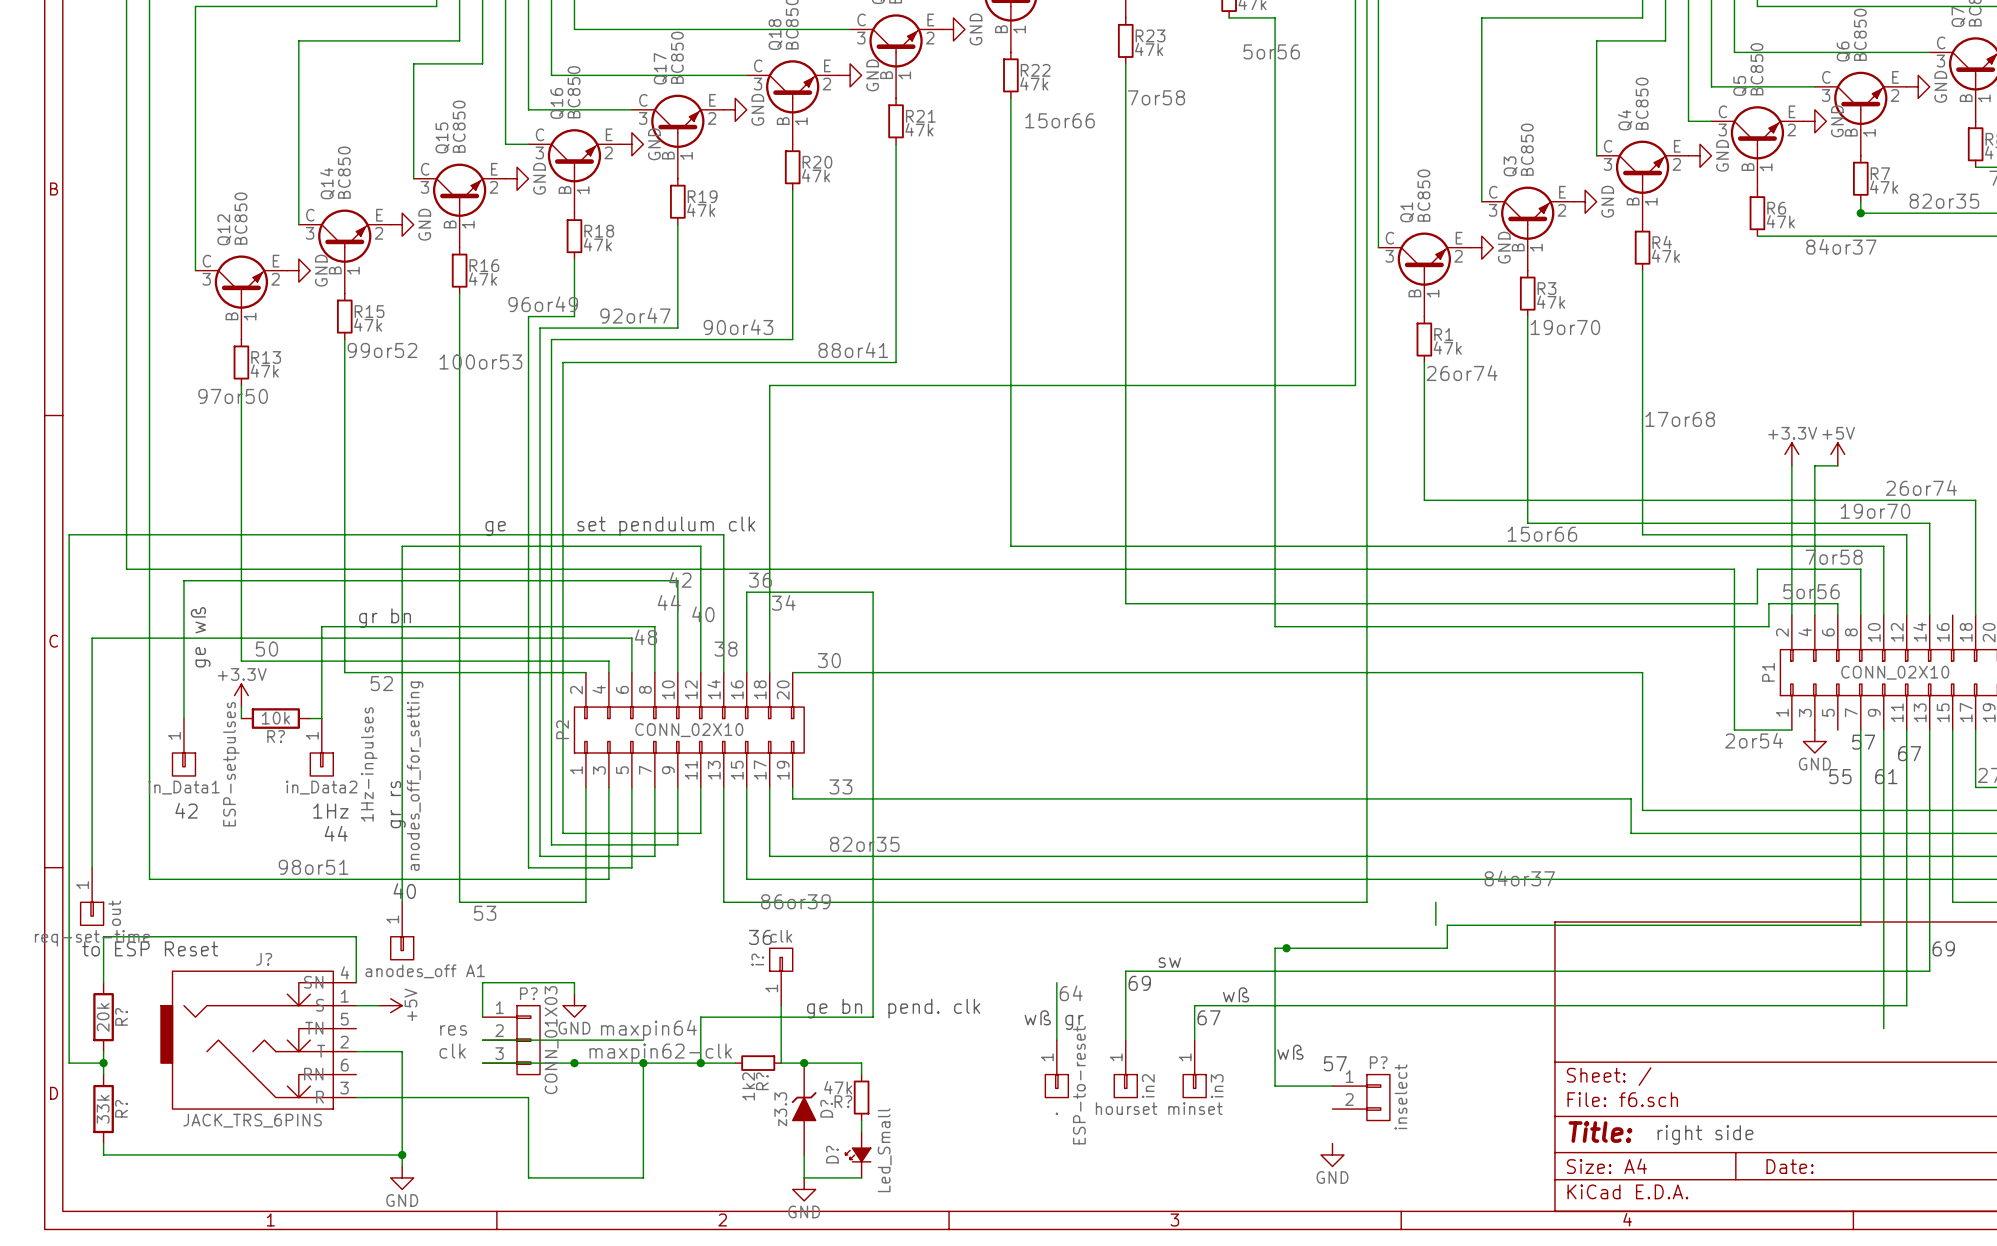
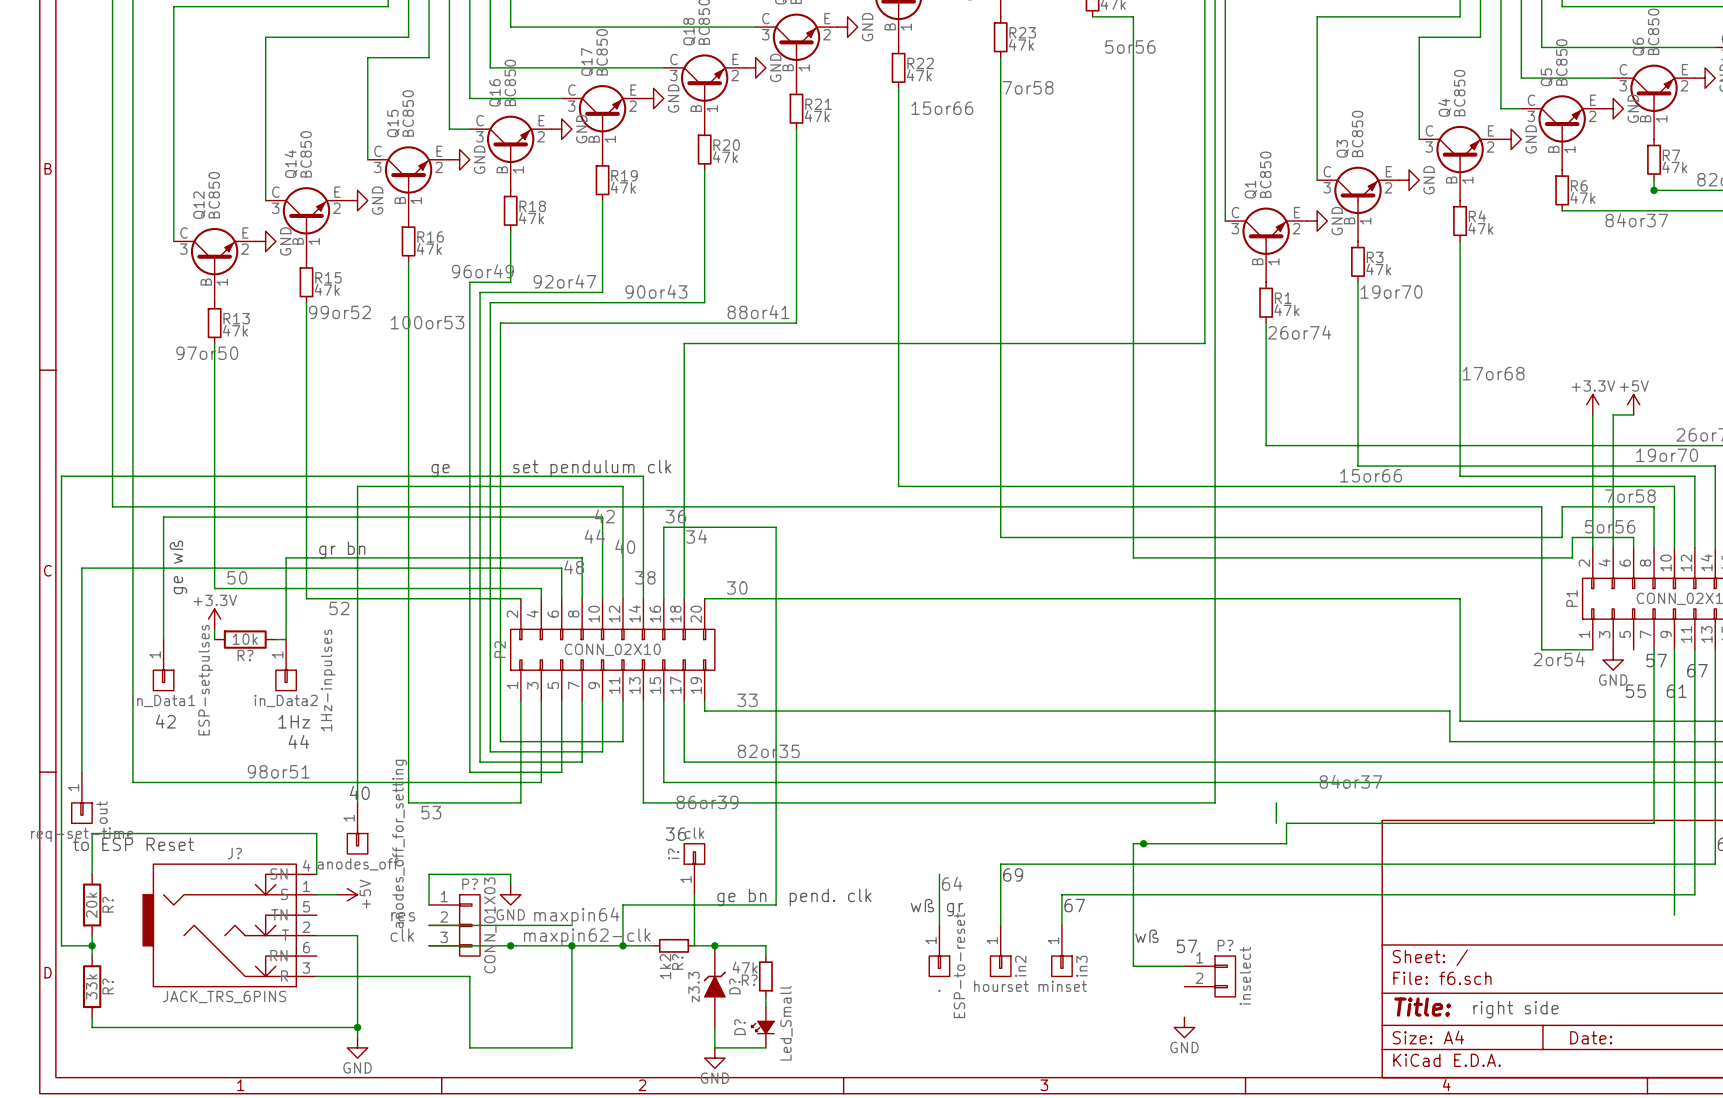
anodes_off_for_setting name position: anodes_off_for_setting (415, 776) -> anodes_off_for_setting (399, 843)
text: gr rs (398, 804) -> none
text: sw (1169, 962) -> none
anodes_off_for_setting value: anodes_off A1 (425, 971) -> anodes_off (358, 864)
text: wß (1236, 994) -> none

